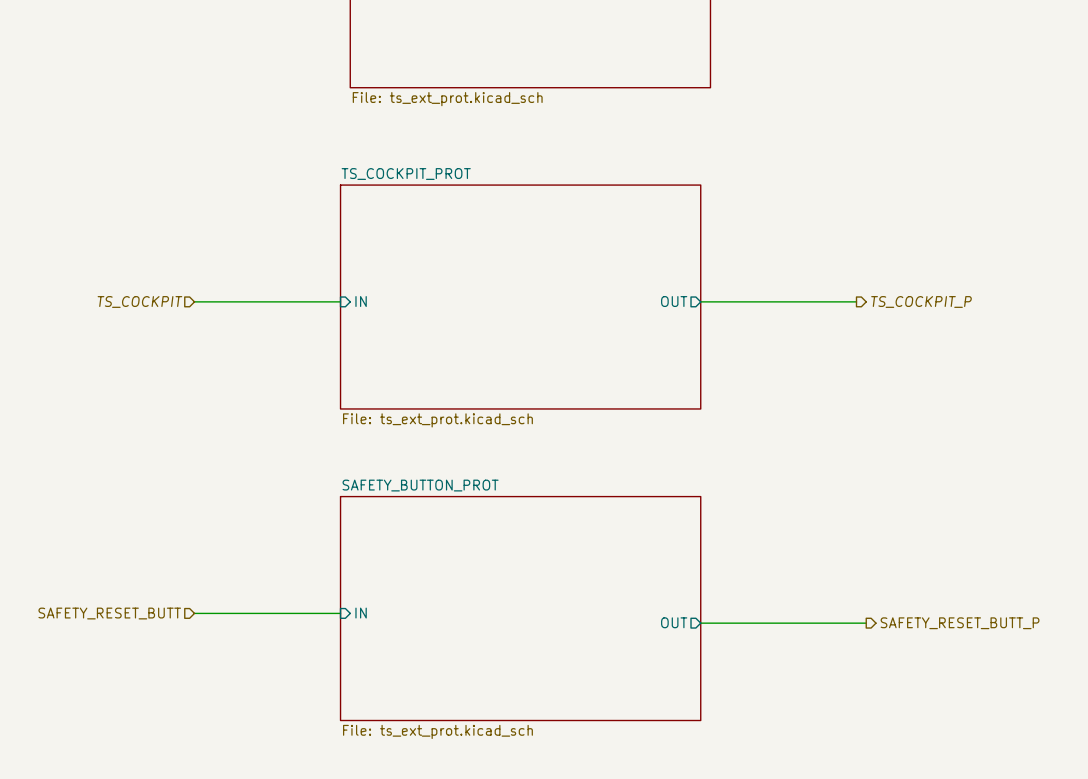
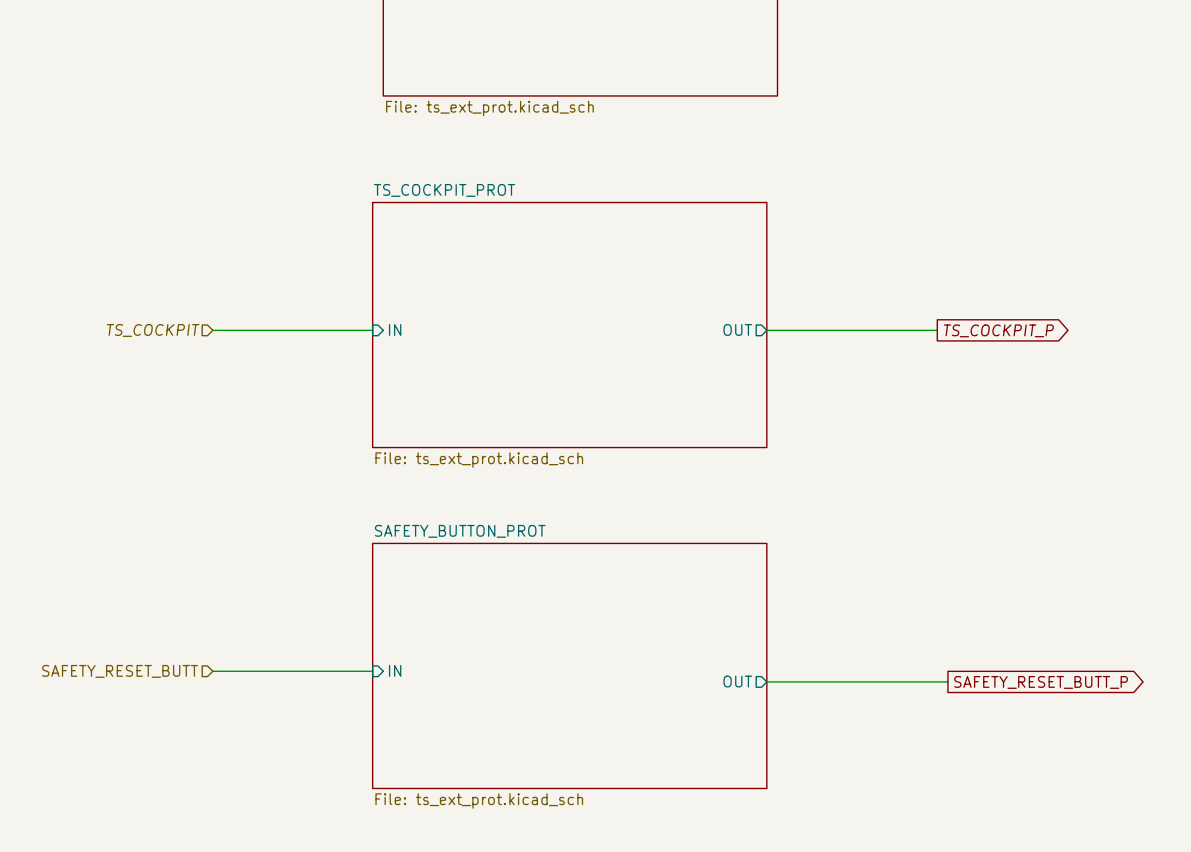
hierarchical label: TS_COCKPIT_P (921, 301) -> none
global label: none -> TS_COCKPIT_P (998, 330)
global label: none -> SAFETY_RESET_BUTT_P (1041, 682)
hierarchical label: SAFETY_RESET_BUTT_P (960, 623) -> none

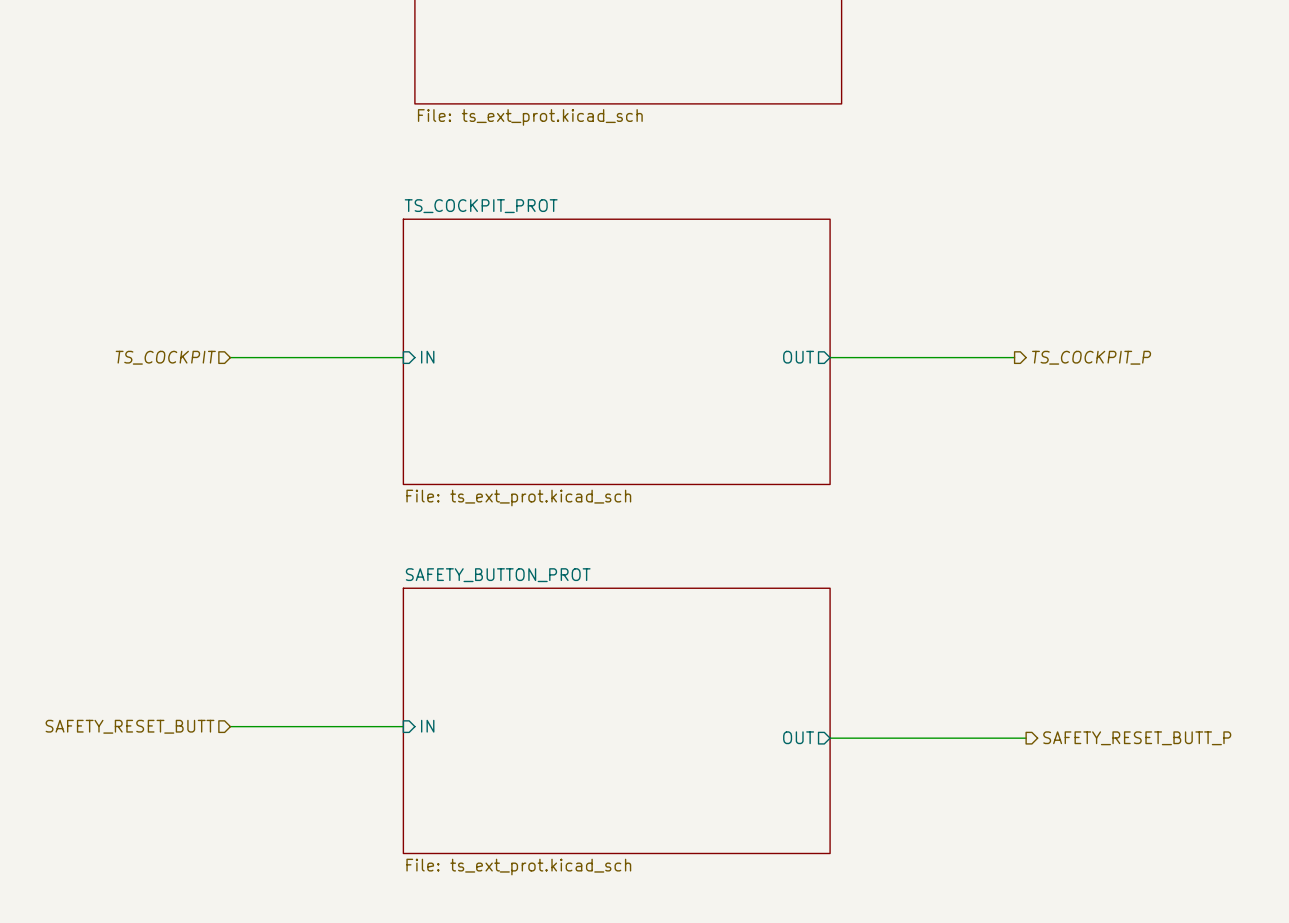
global label: TS_COCKPIT_P (998, 330) -> none
hierarchical label: none -> TS_COCKPIT_P (1091, 357)
global label: SAFETY_RESET_BUTT_P (1041, 682) -> none
hierarchical label: none -> SAFETY_RESET_BUTT_P (1137, 738)

